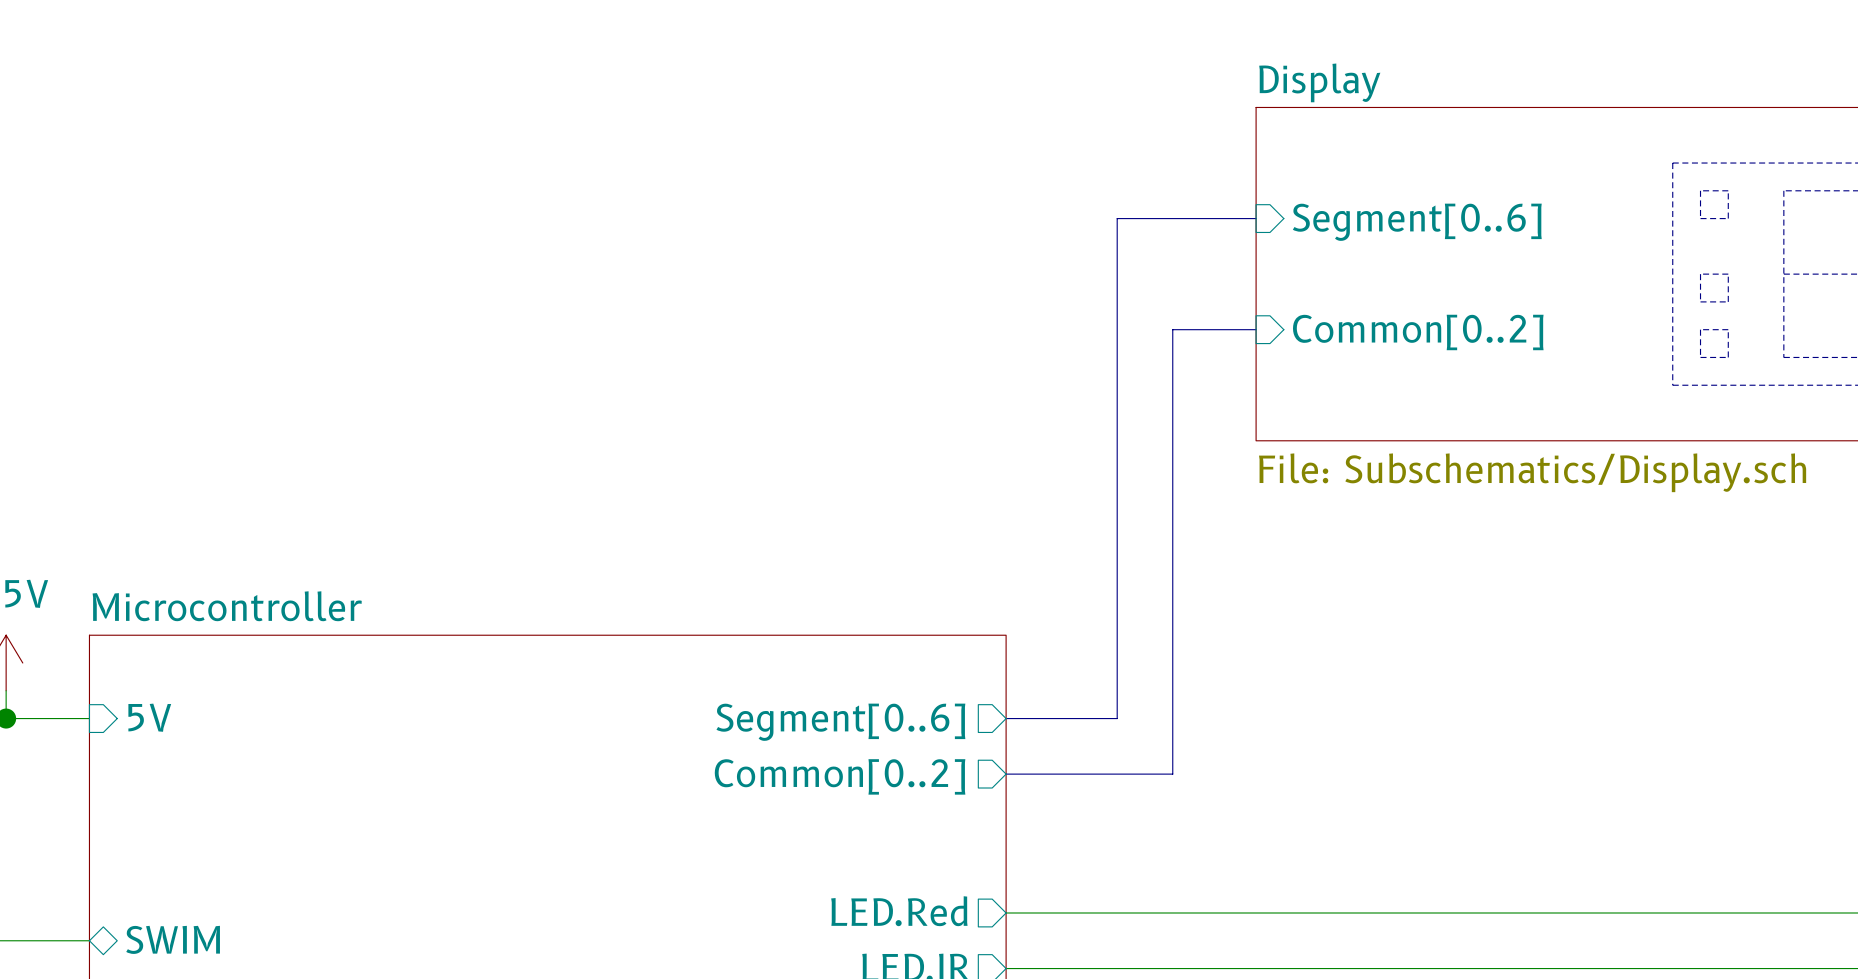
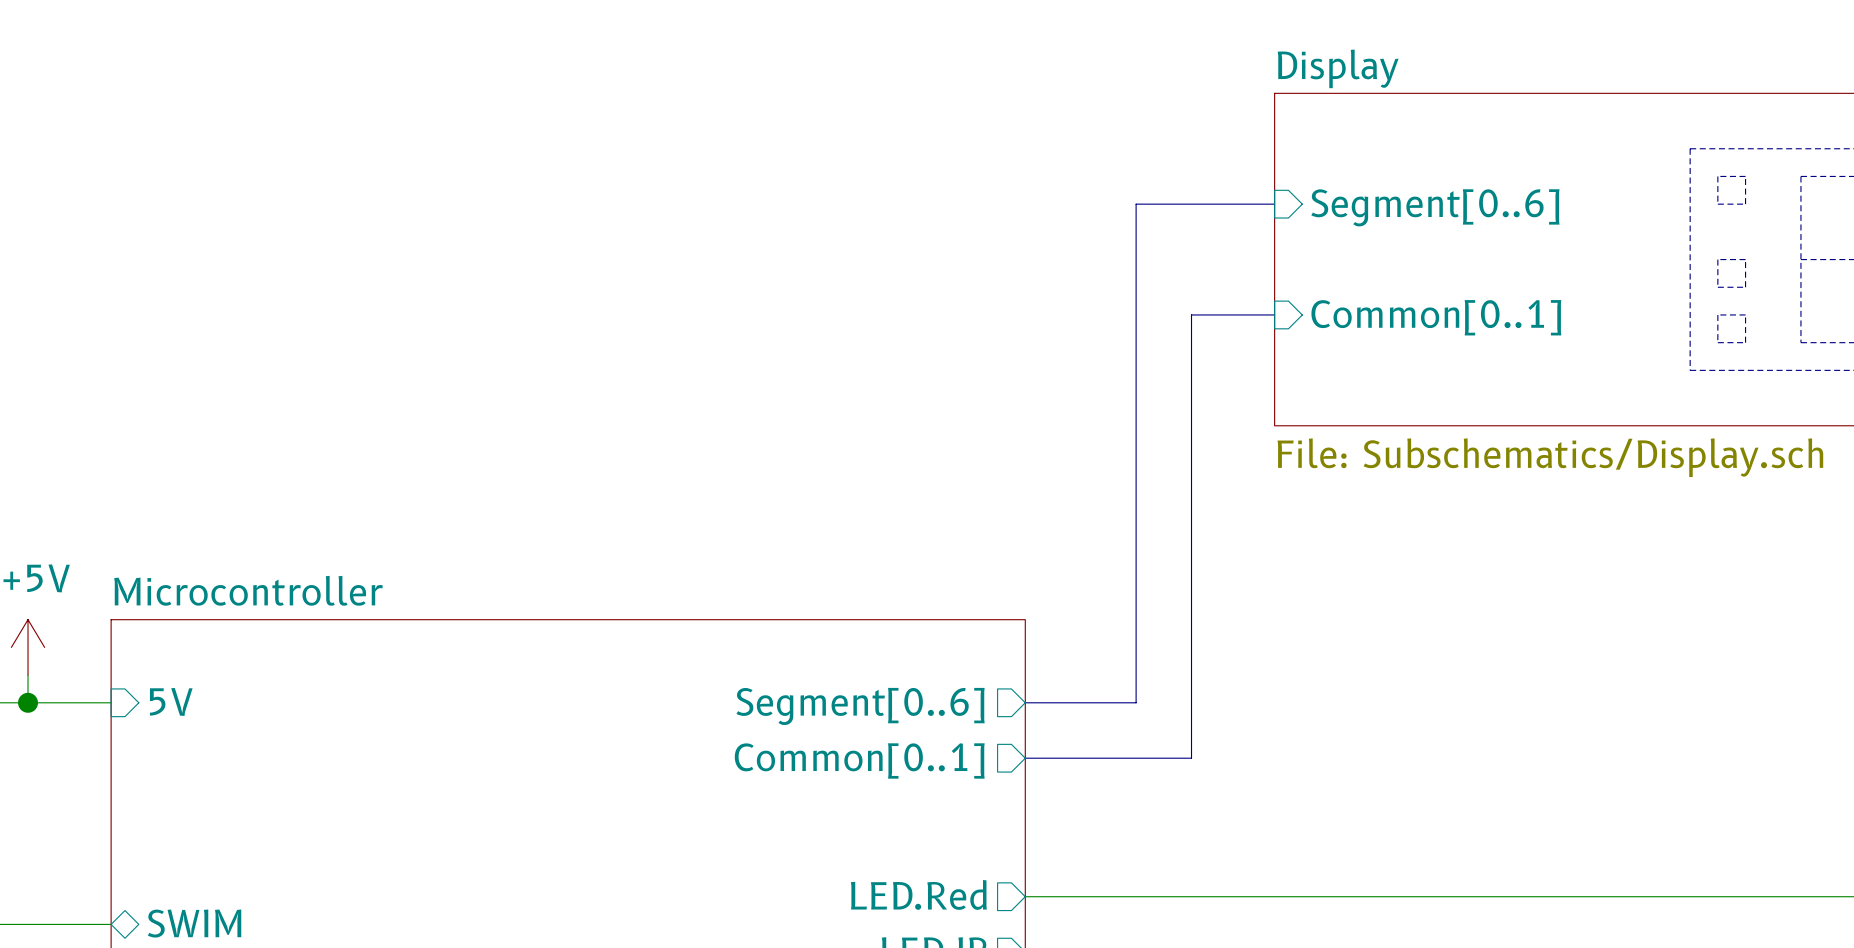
sheet pin: Common[0..2] (1418, 332) -> Common[0..1] (1436, 317)
sheet pin: Common[0..2] (840, 776) -> Common[0..1] (859, 760)

